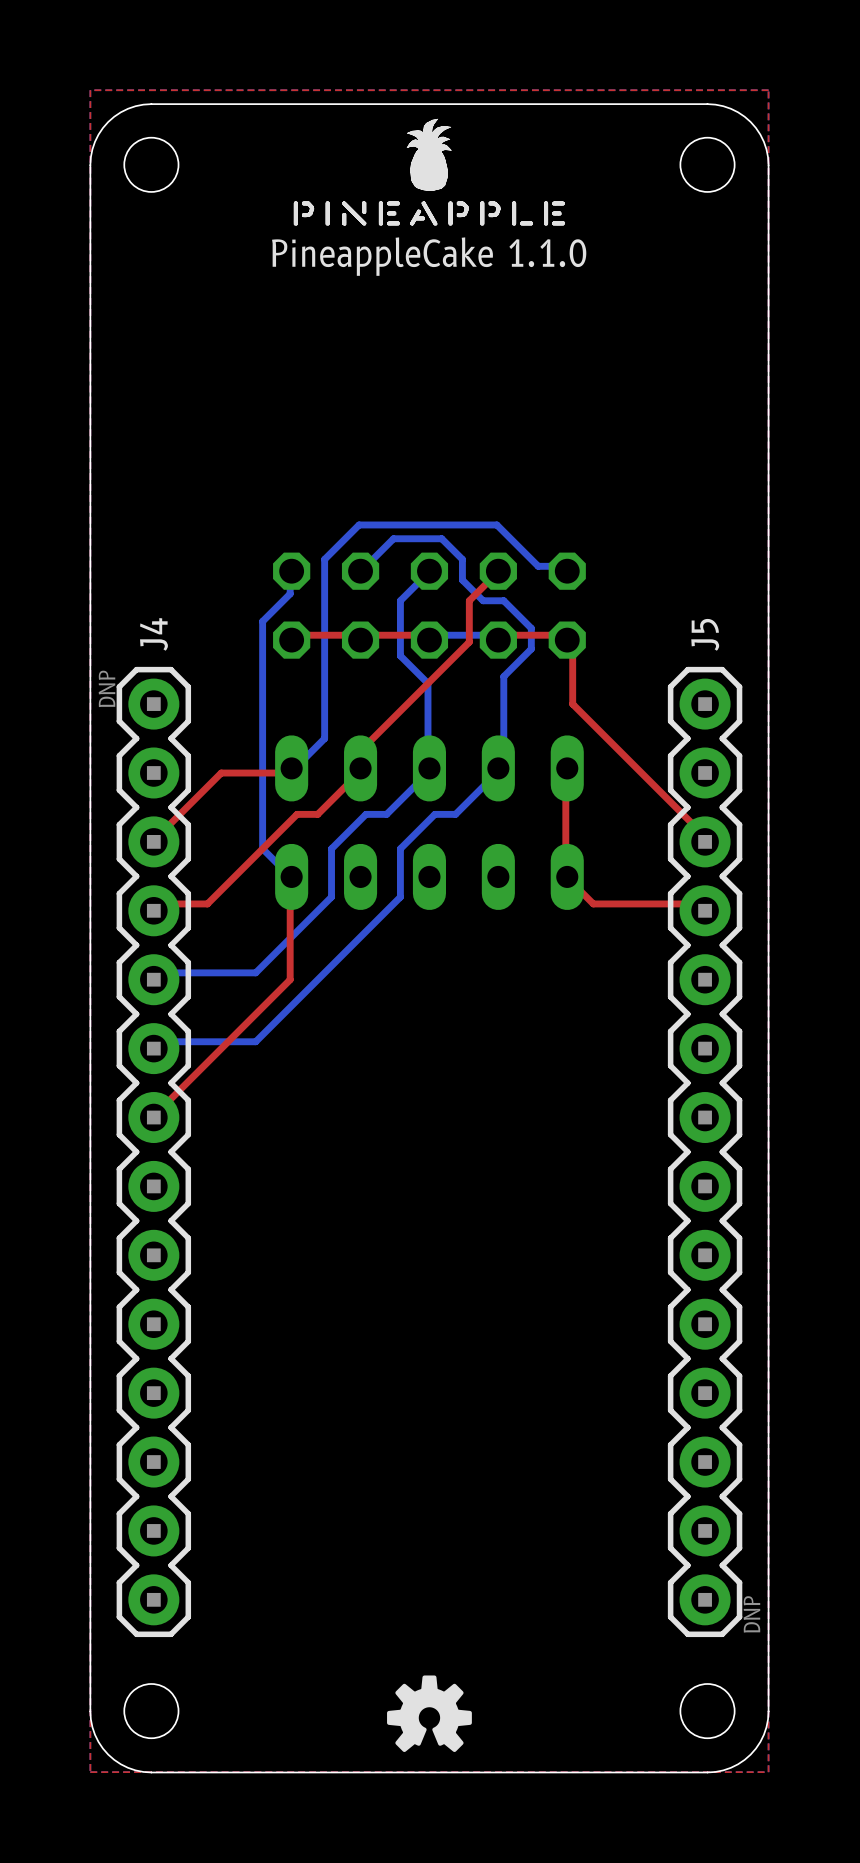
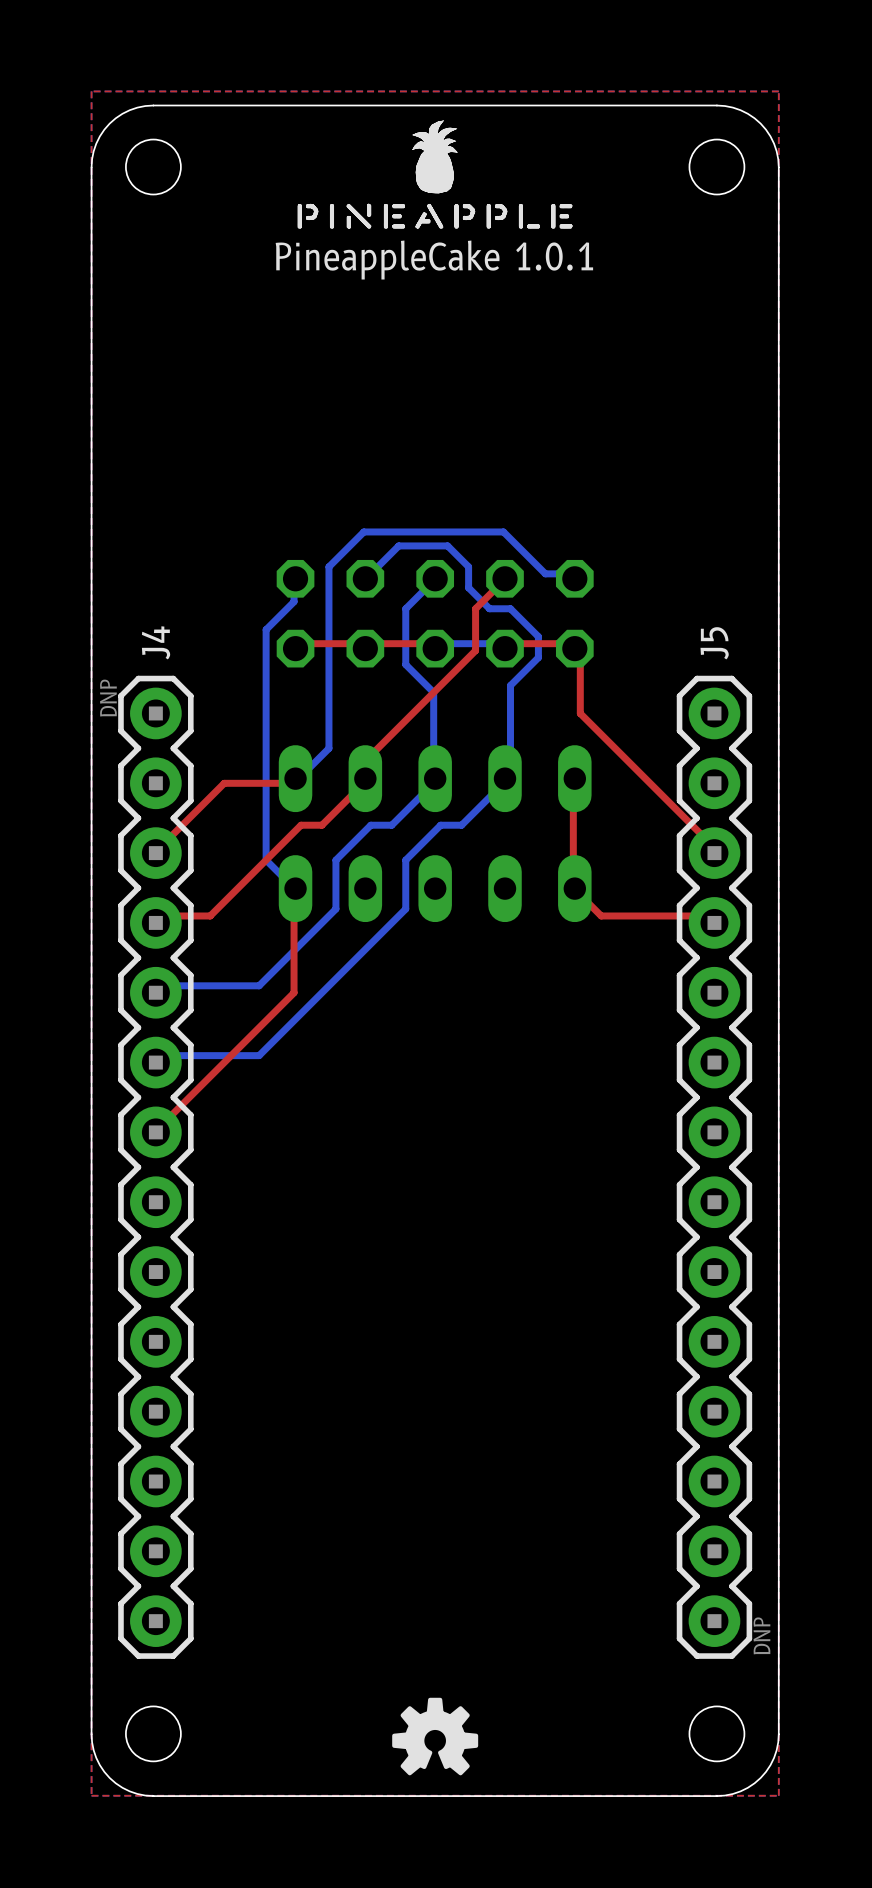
text: PineappleCake 1.1.0 (429, 256) -> PineappleCake 1.0.1 (434, 260)

